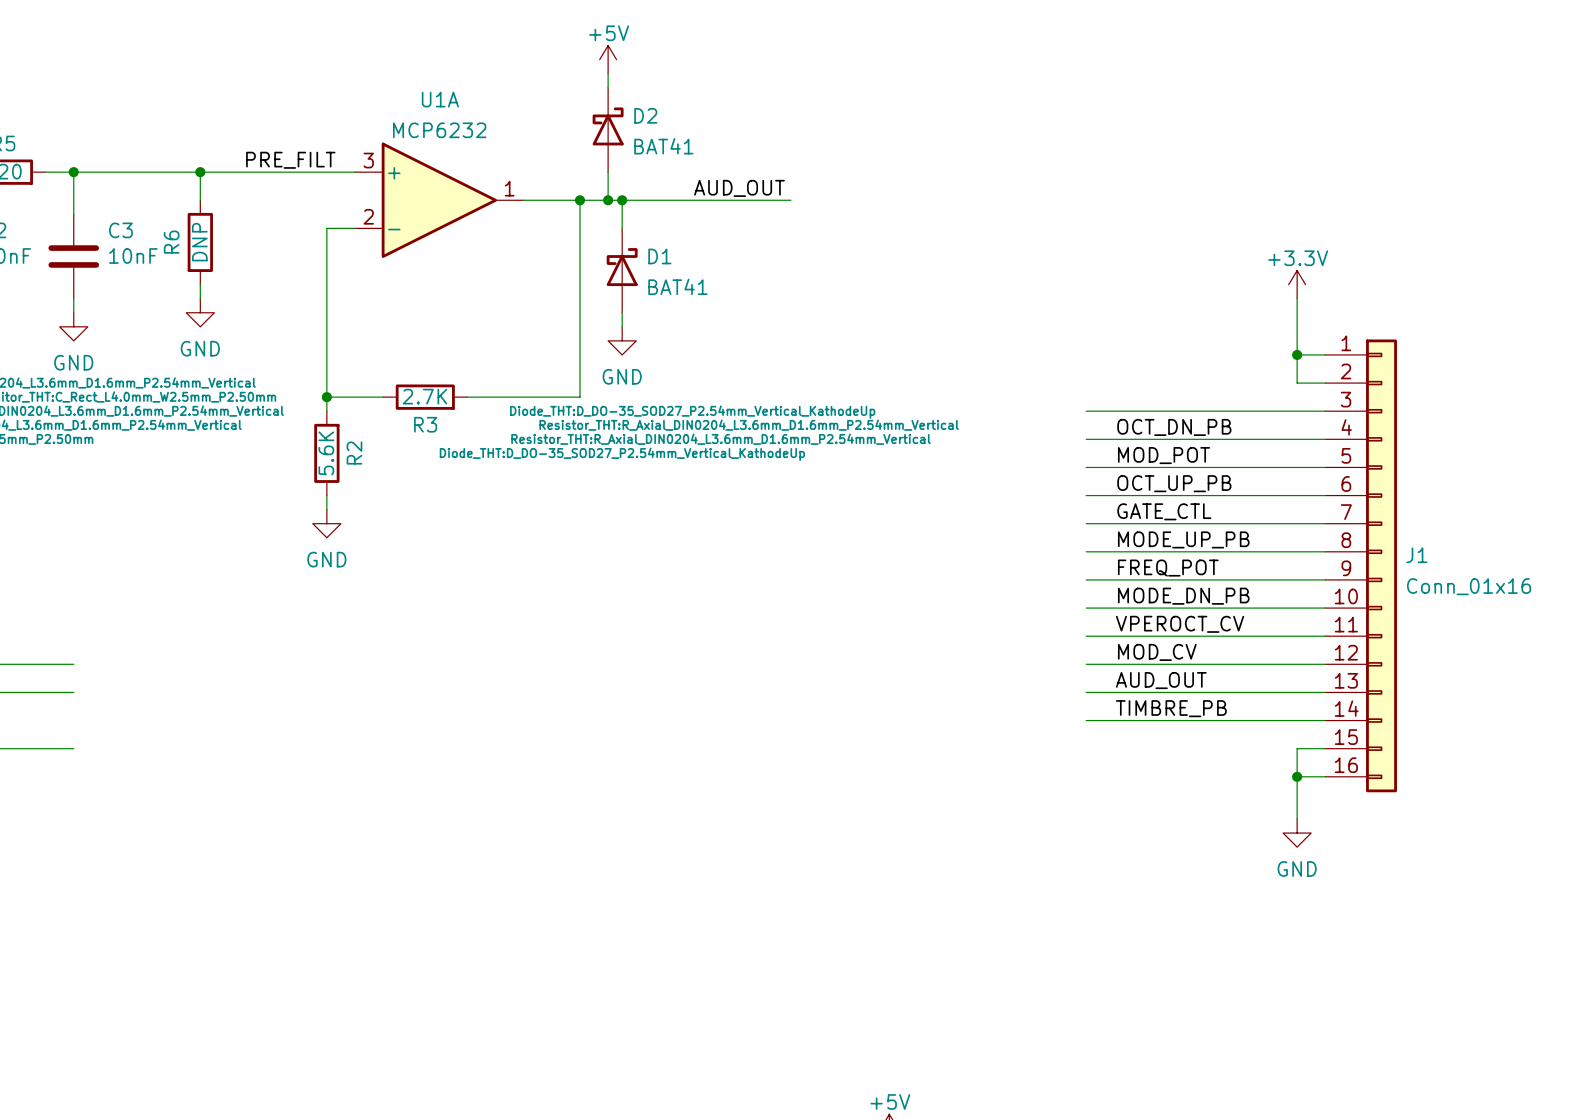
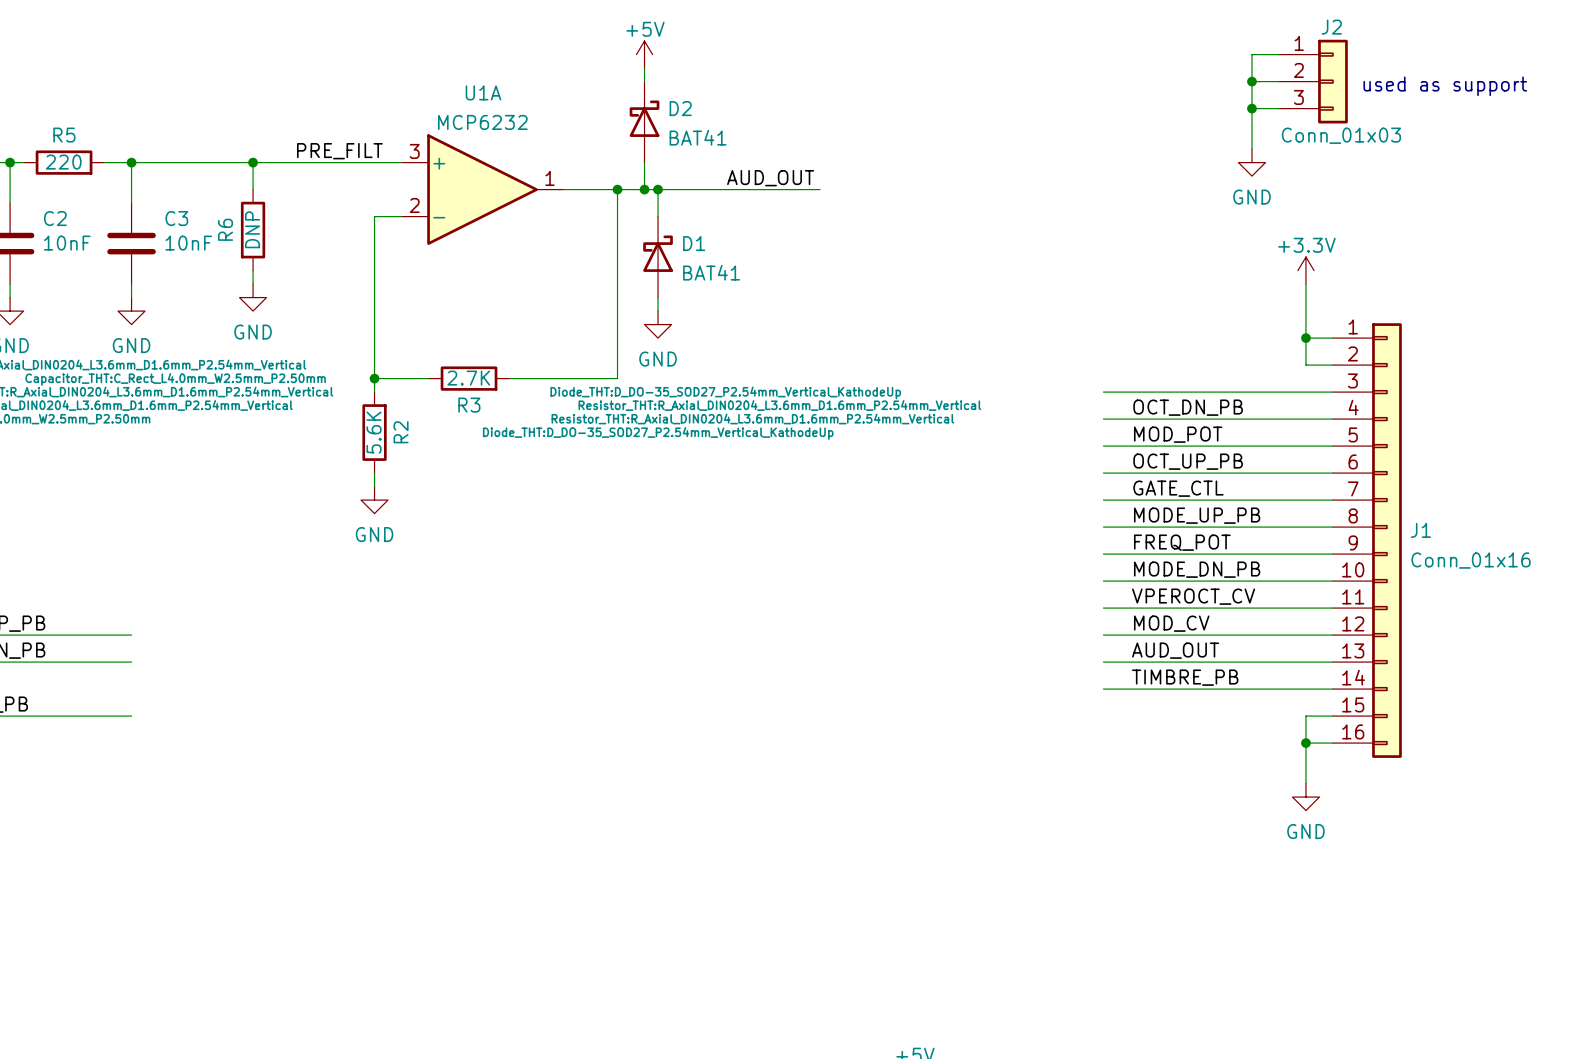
wire: none -> (1278, 54) (1251, 54) (1251, 149)
wire: none -> (1251, 81) (1278, 81)
junction: none -> (1251, 81)
J2: none -> Conn_01x03 (1313, 81)
text: none -> used as support (1445, 86)
wire: none -> (1251, 108) (1278, 108)
junction: none -> (1251, 108)
power symbol: none -> GND (1251, 162)

